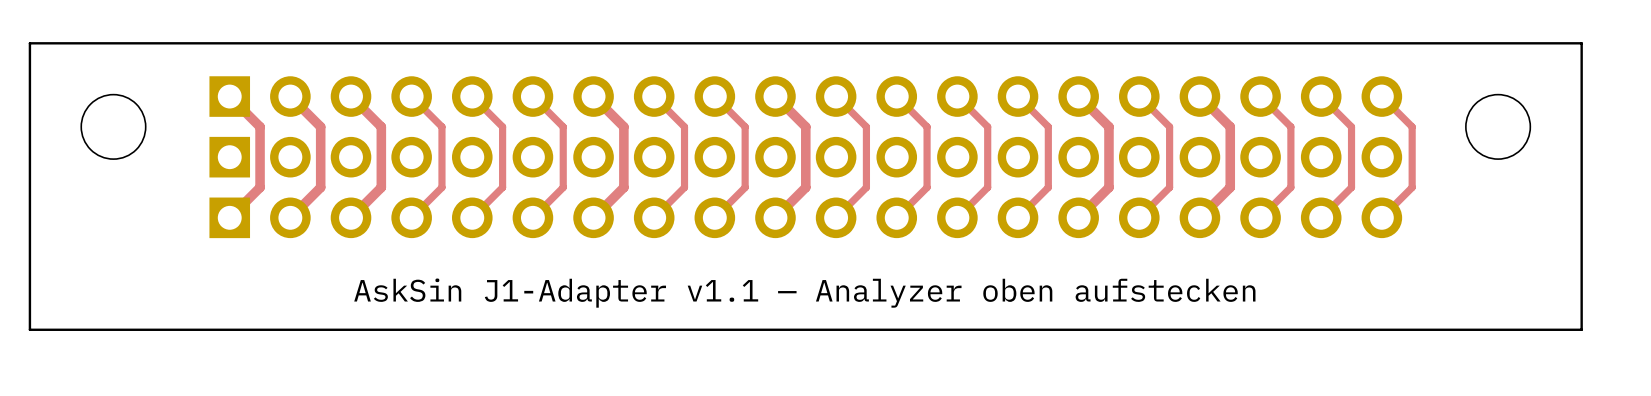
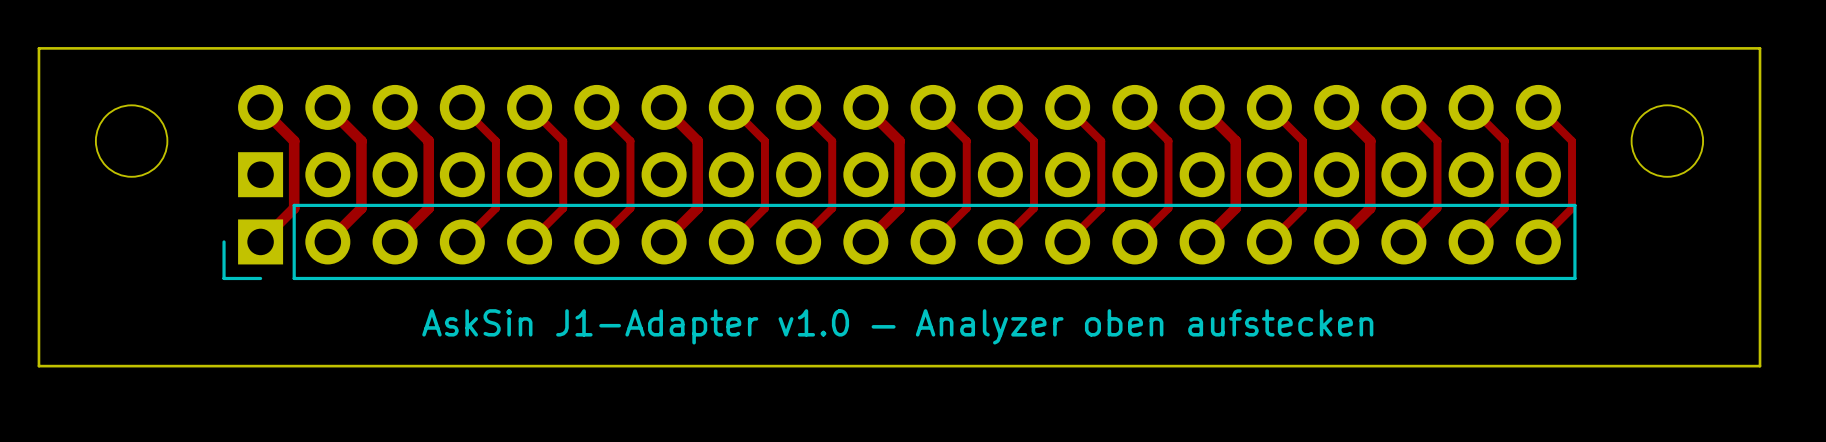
part: (805, 96) -> none
part: none -> (899, 141)
part footprint: [209, 197, 1403, 239] -> [222, 203, 1577, 281]
text: AskSin J1-Adapter v1.1 — Analyzer oben aufstecken (804, 293) -> AskSin J1-Adapter v1.0 — Analyzer oben aufstecken (897, 326)

